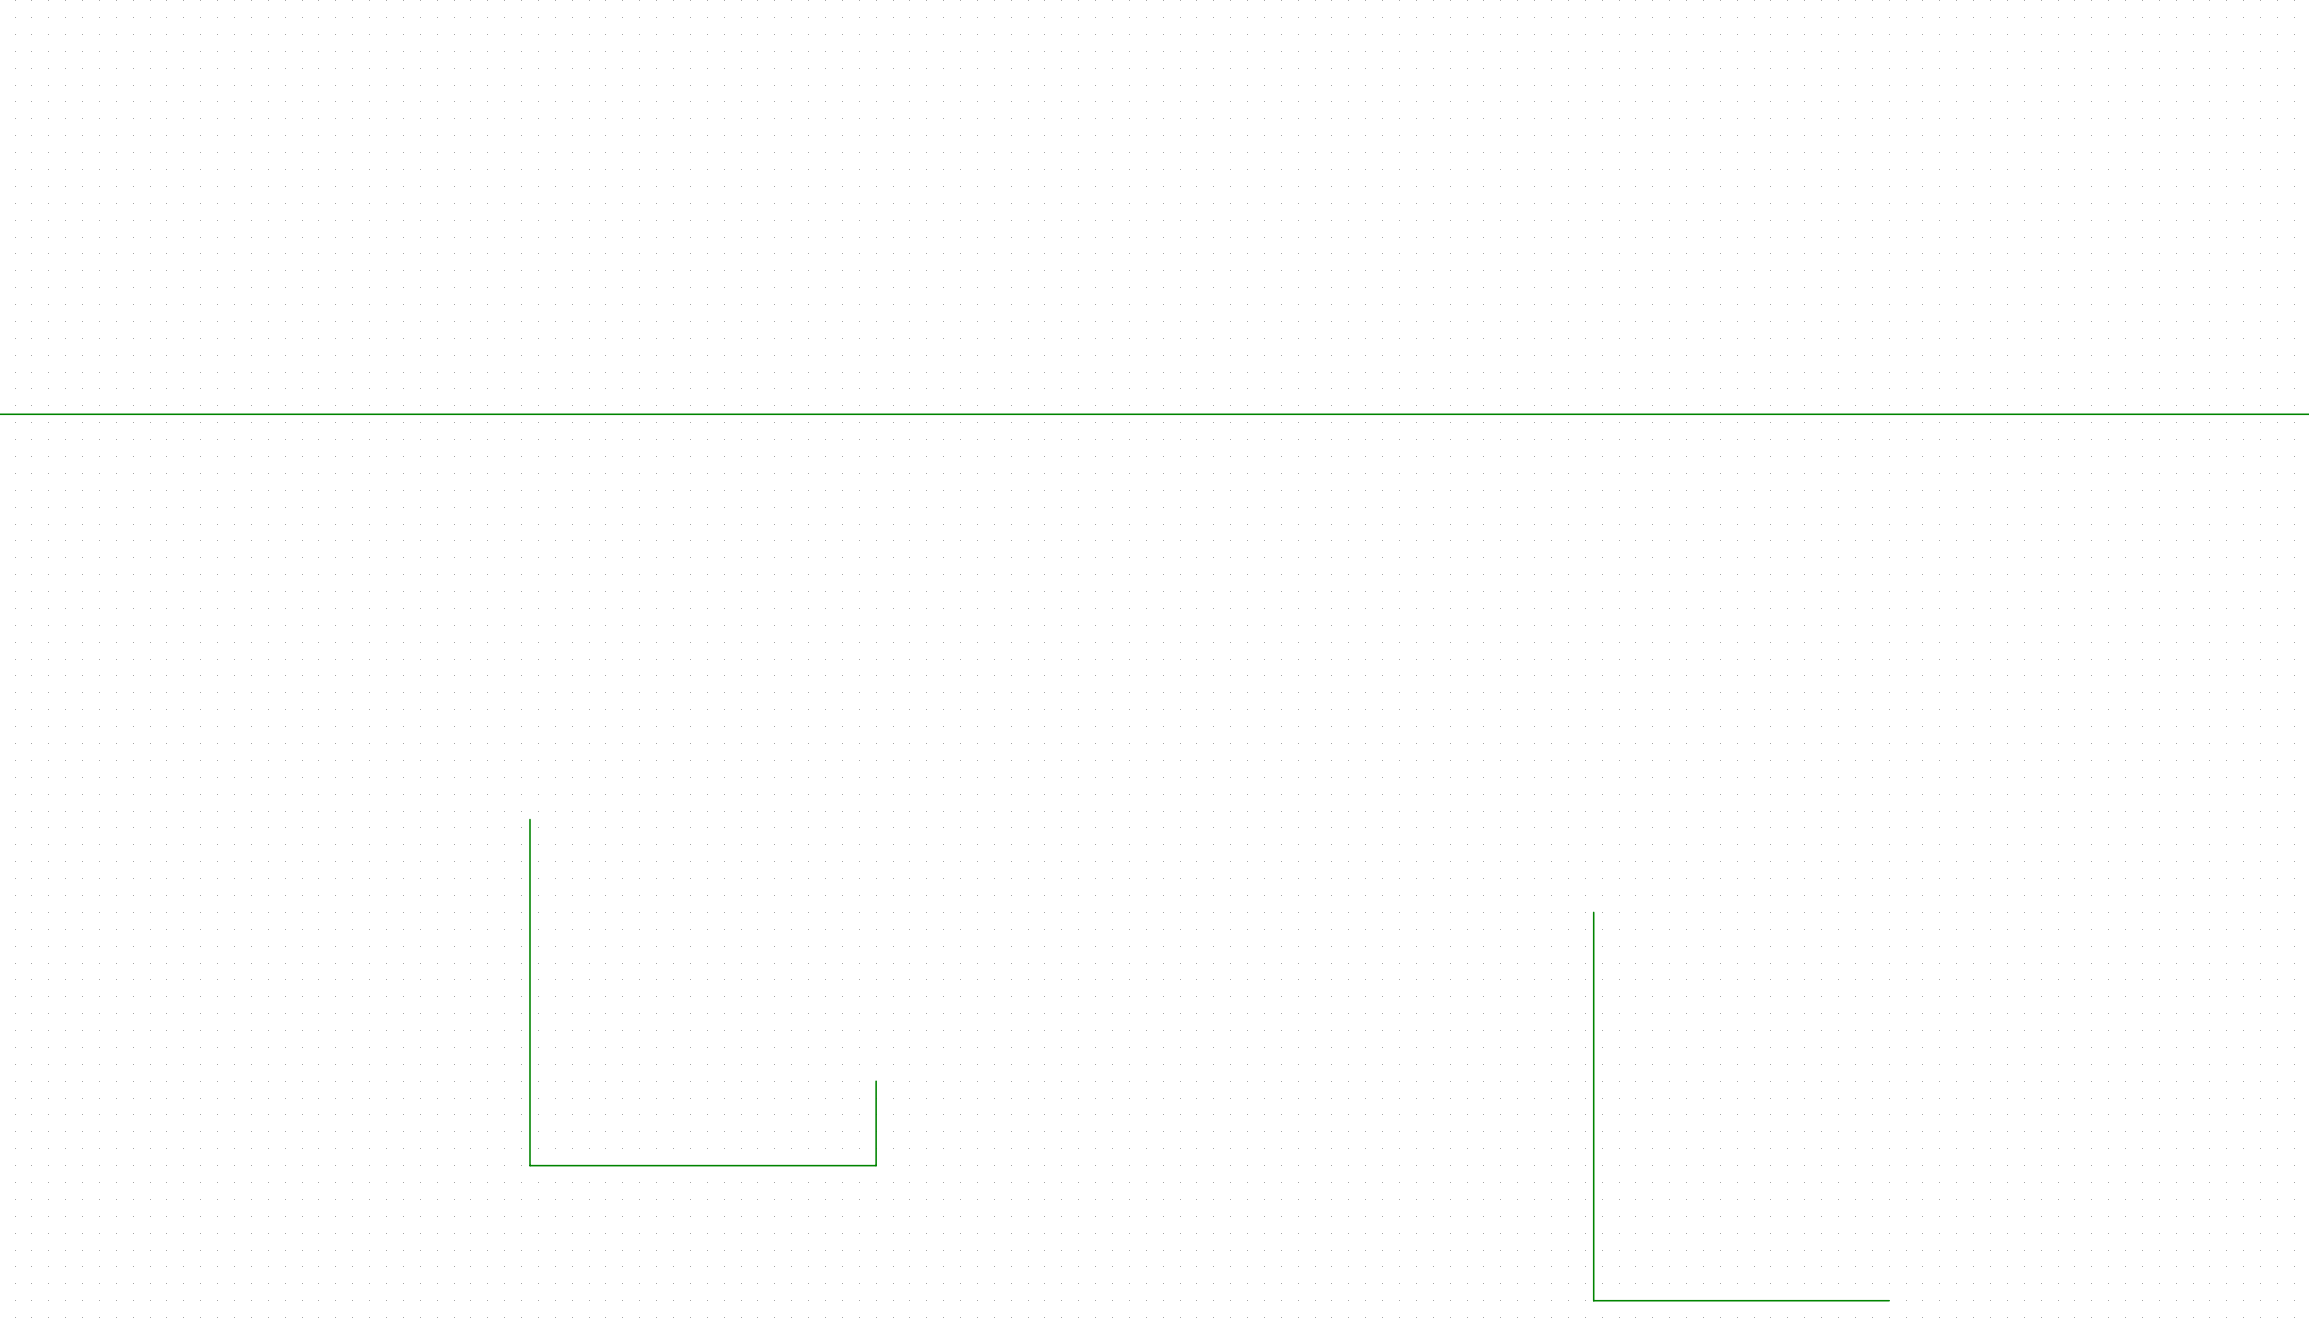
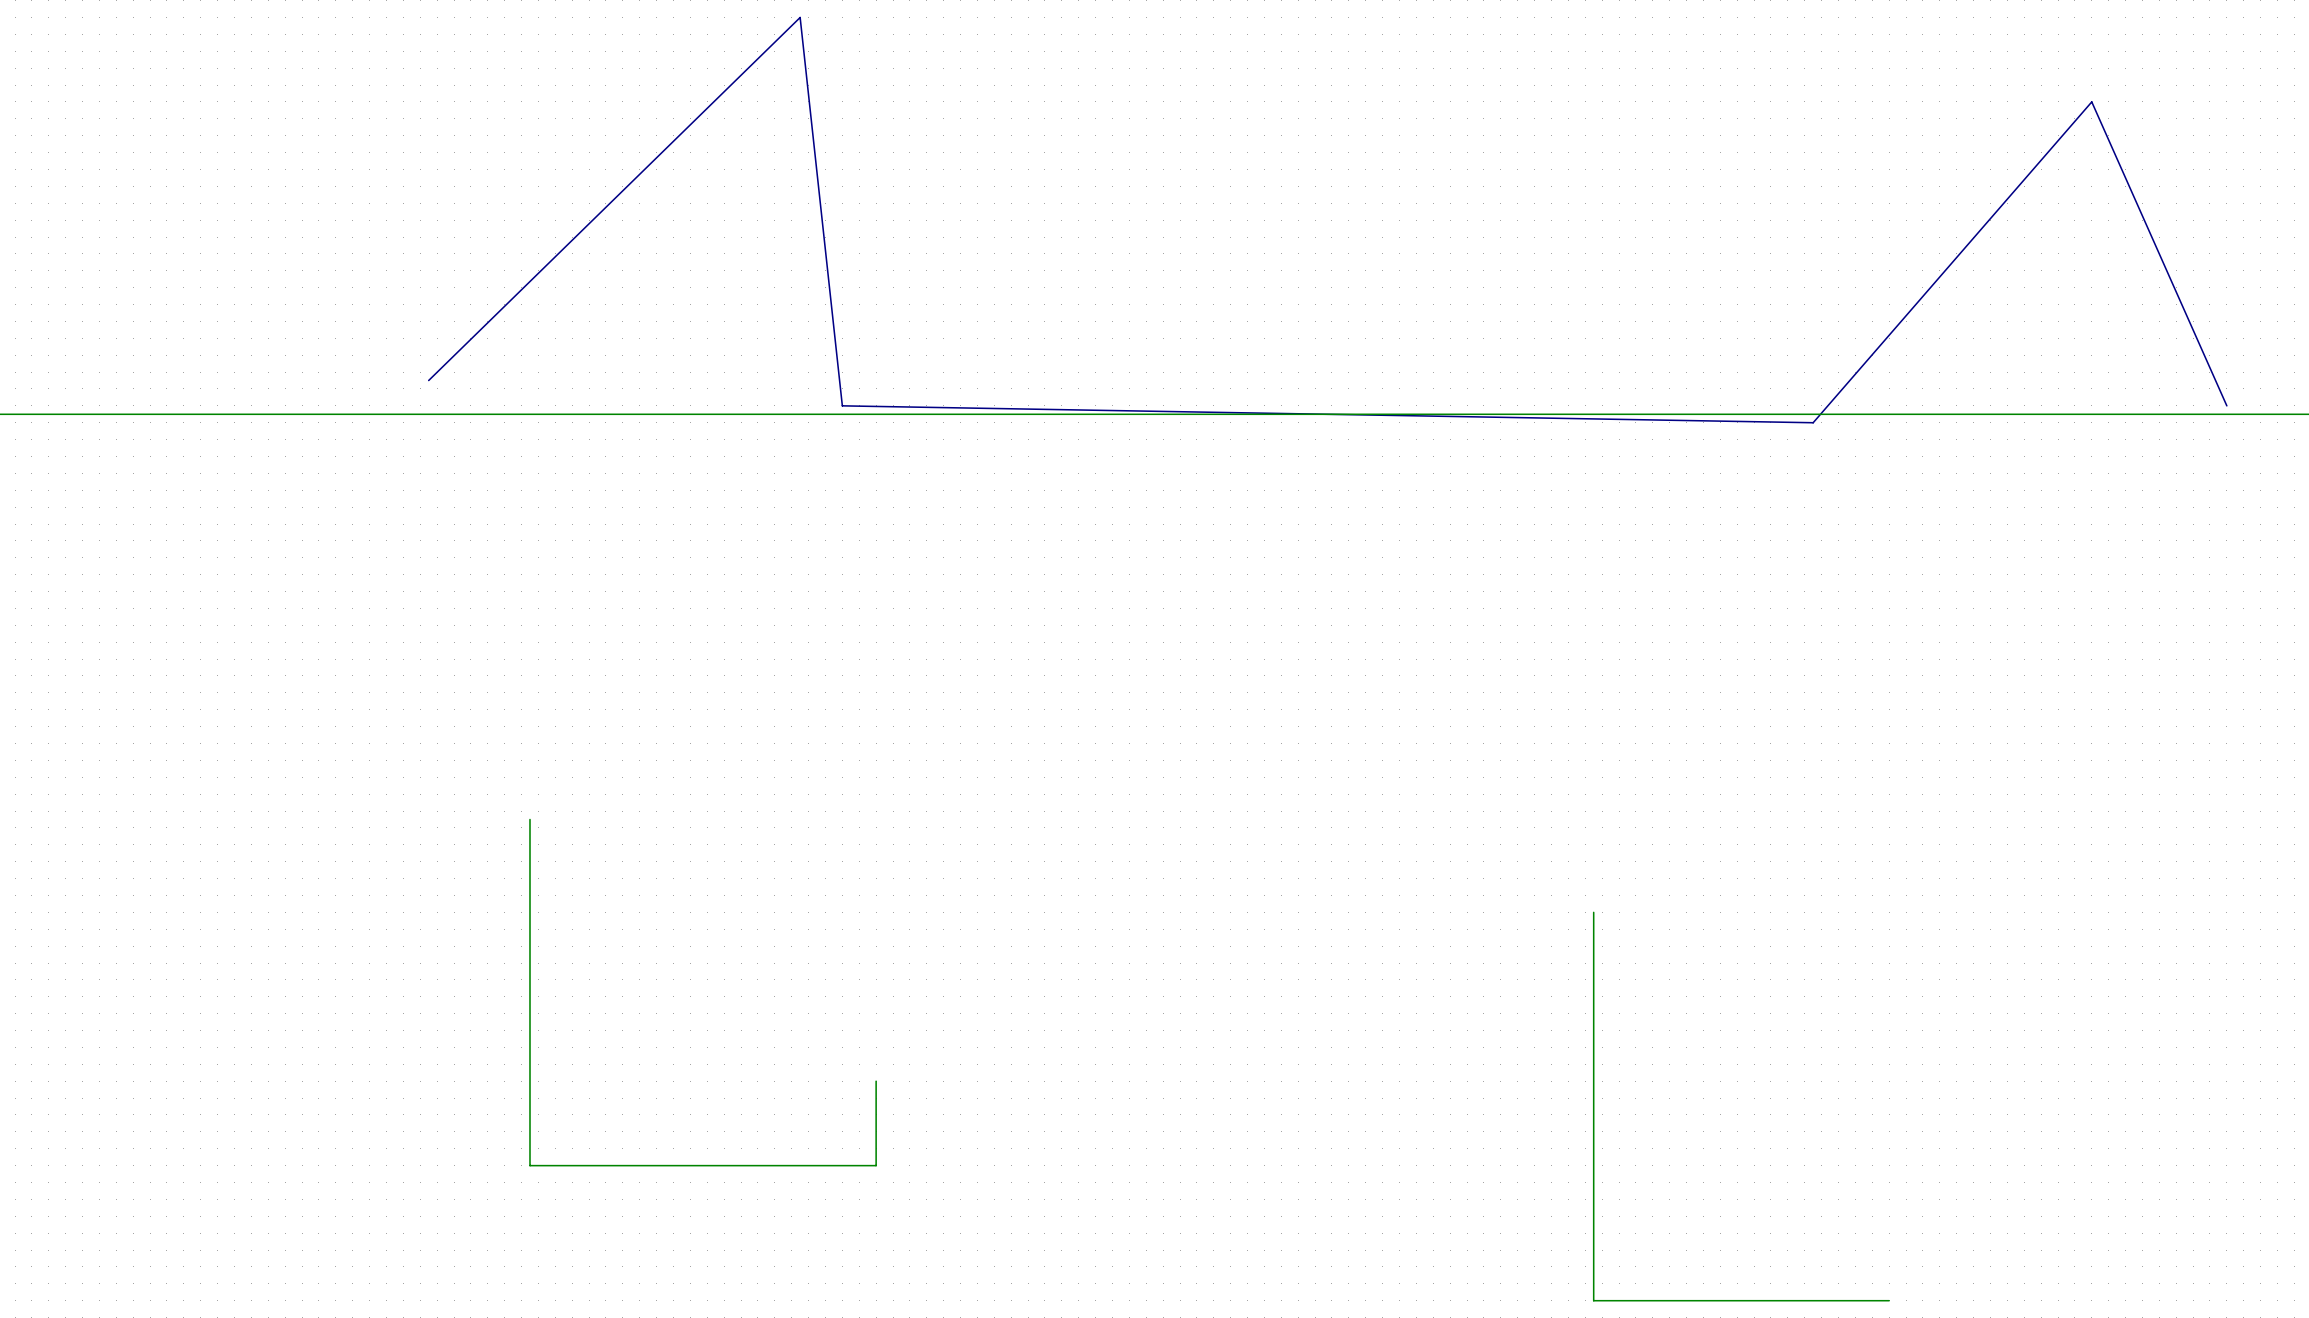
bus: none -> (428, 380) (800, 17) (842, 405) (1813, 422) (2091, 101) (2226, 405)

